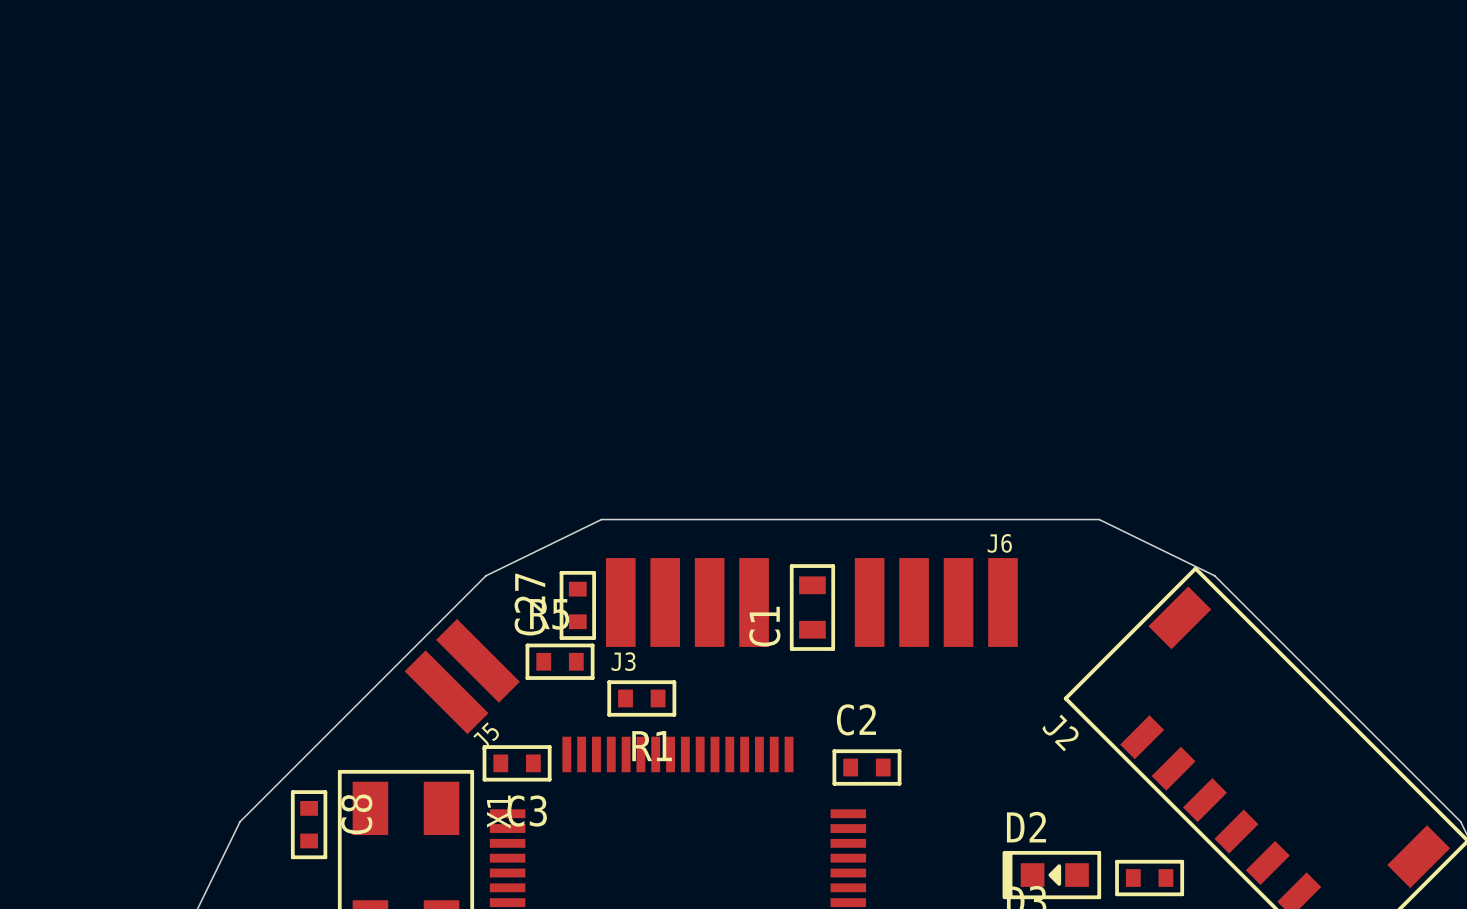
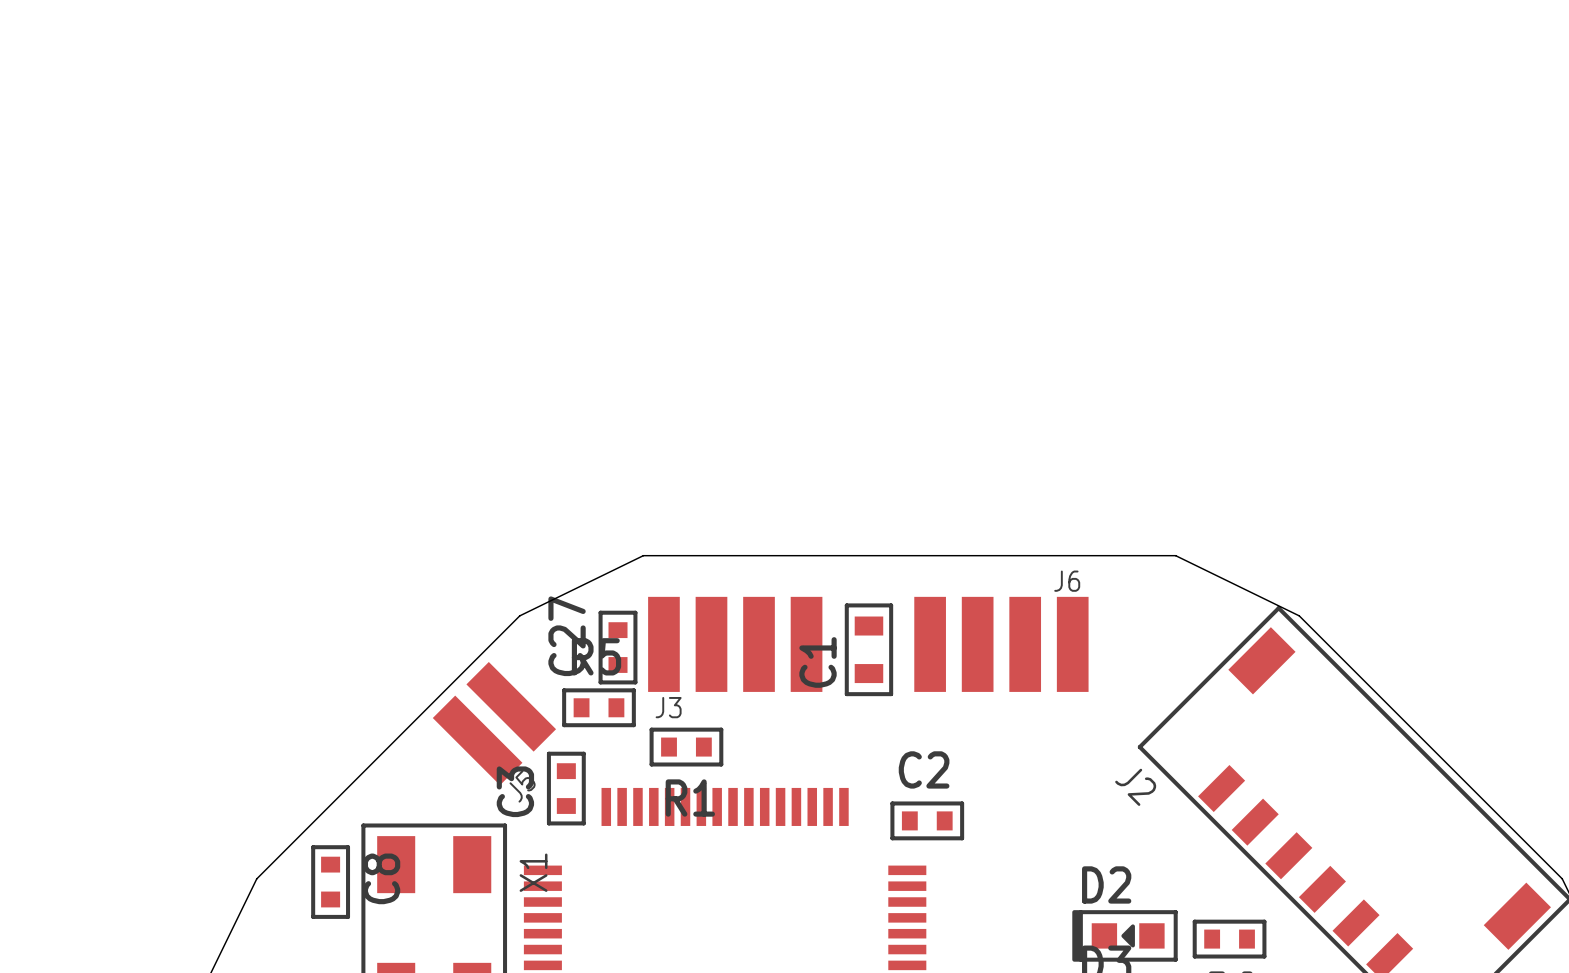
C3 rotation: 0° (517, 763) -> 90° clockwise (566, 788)

